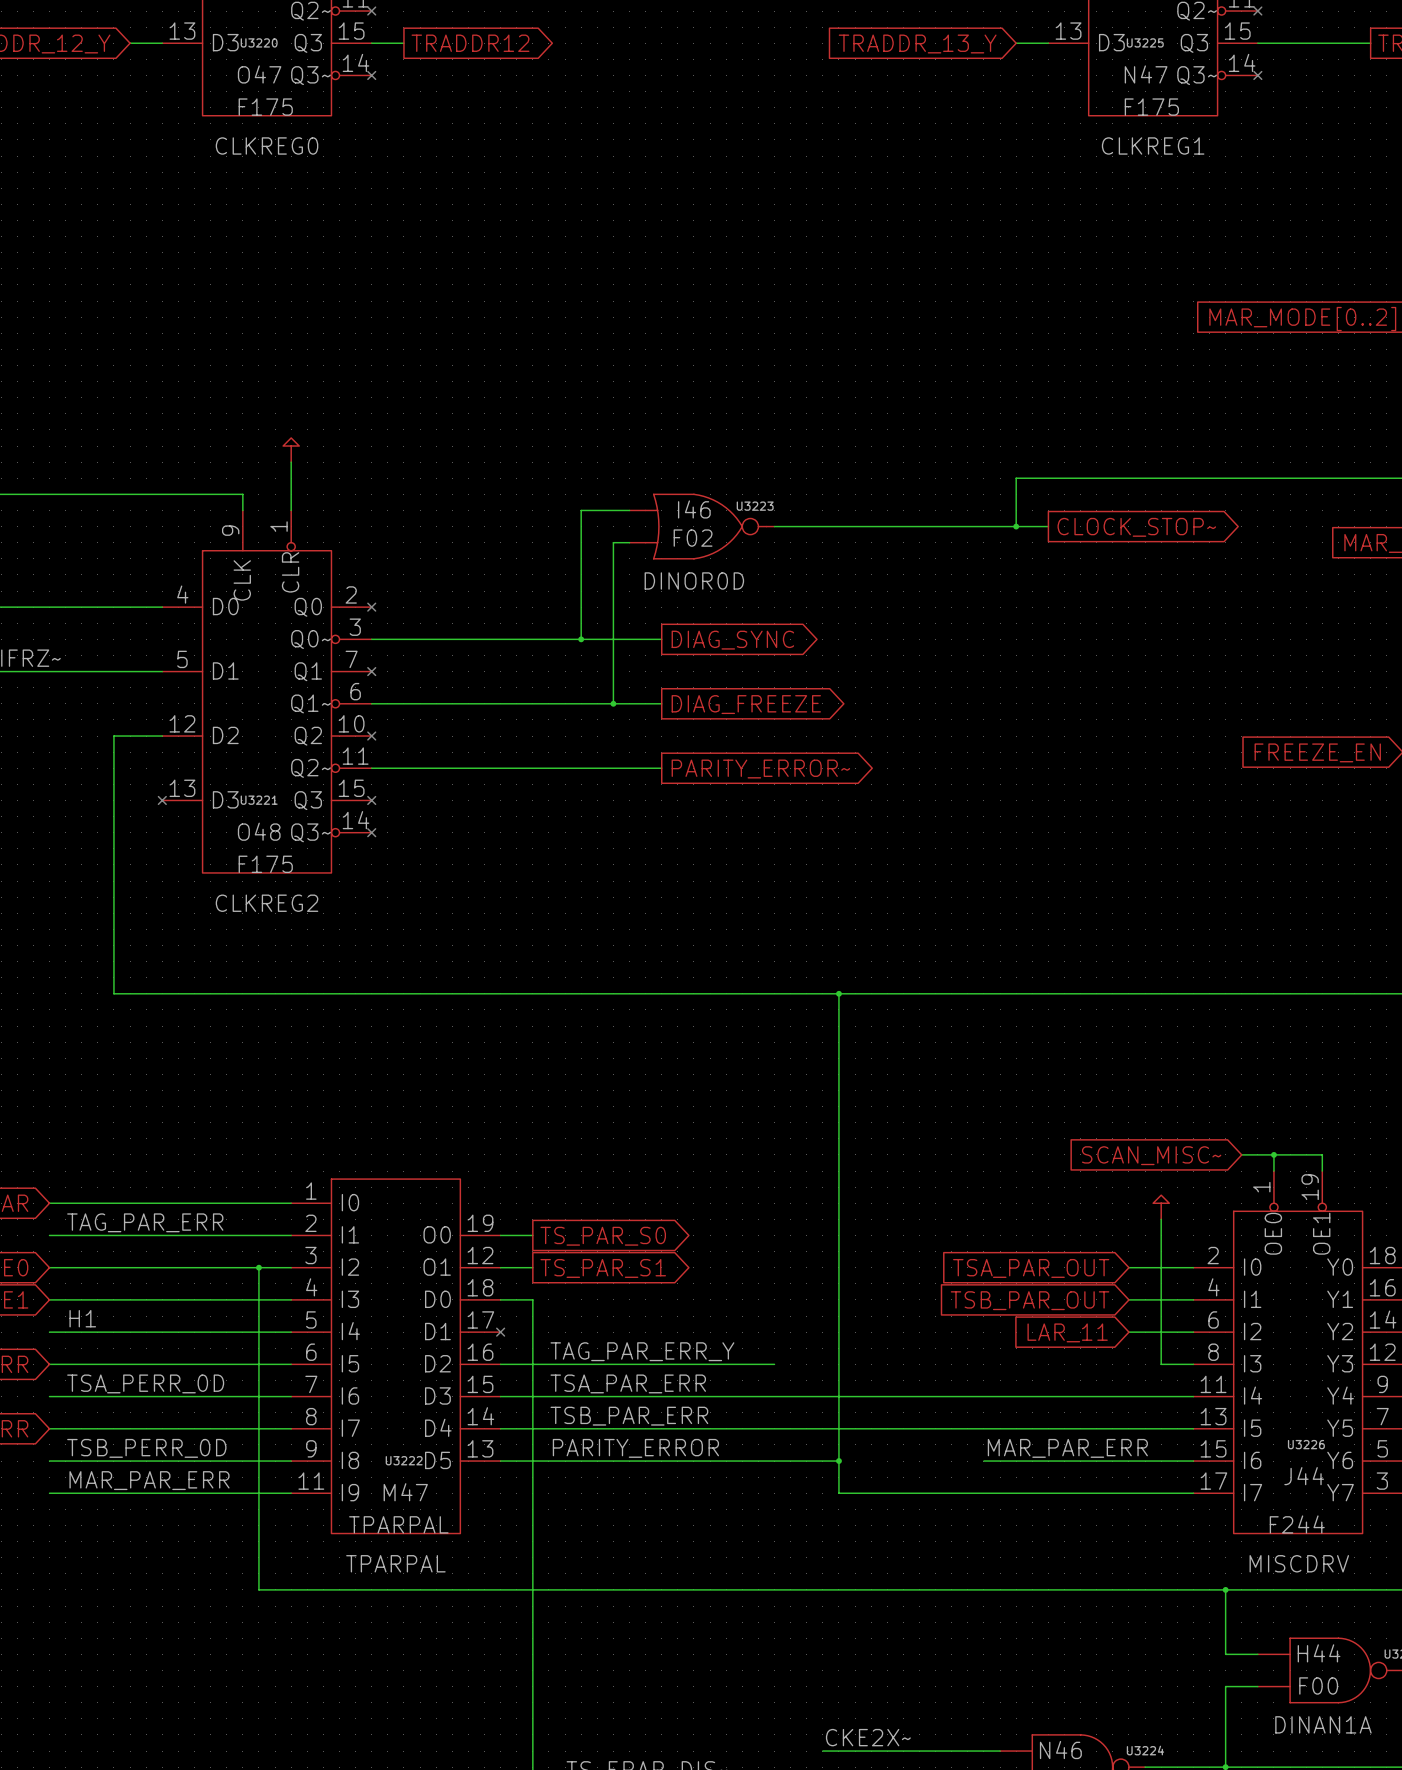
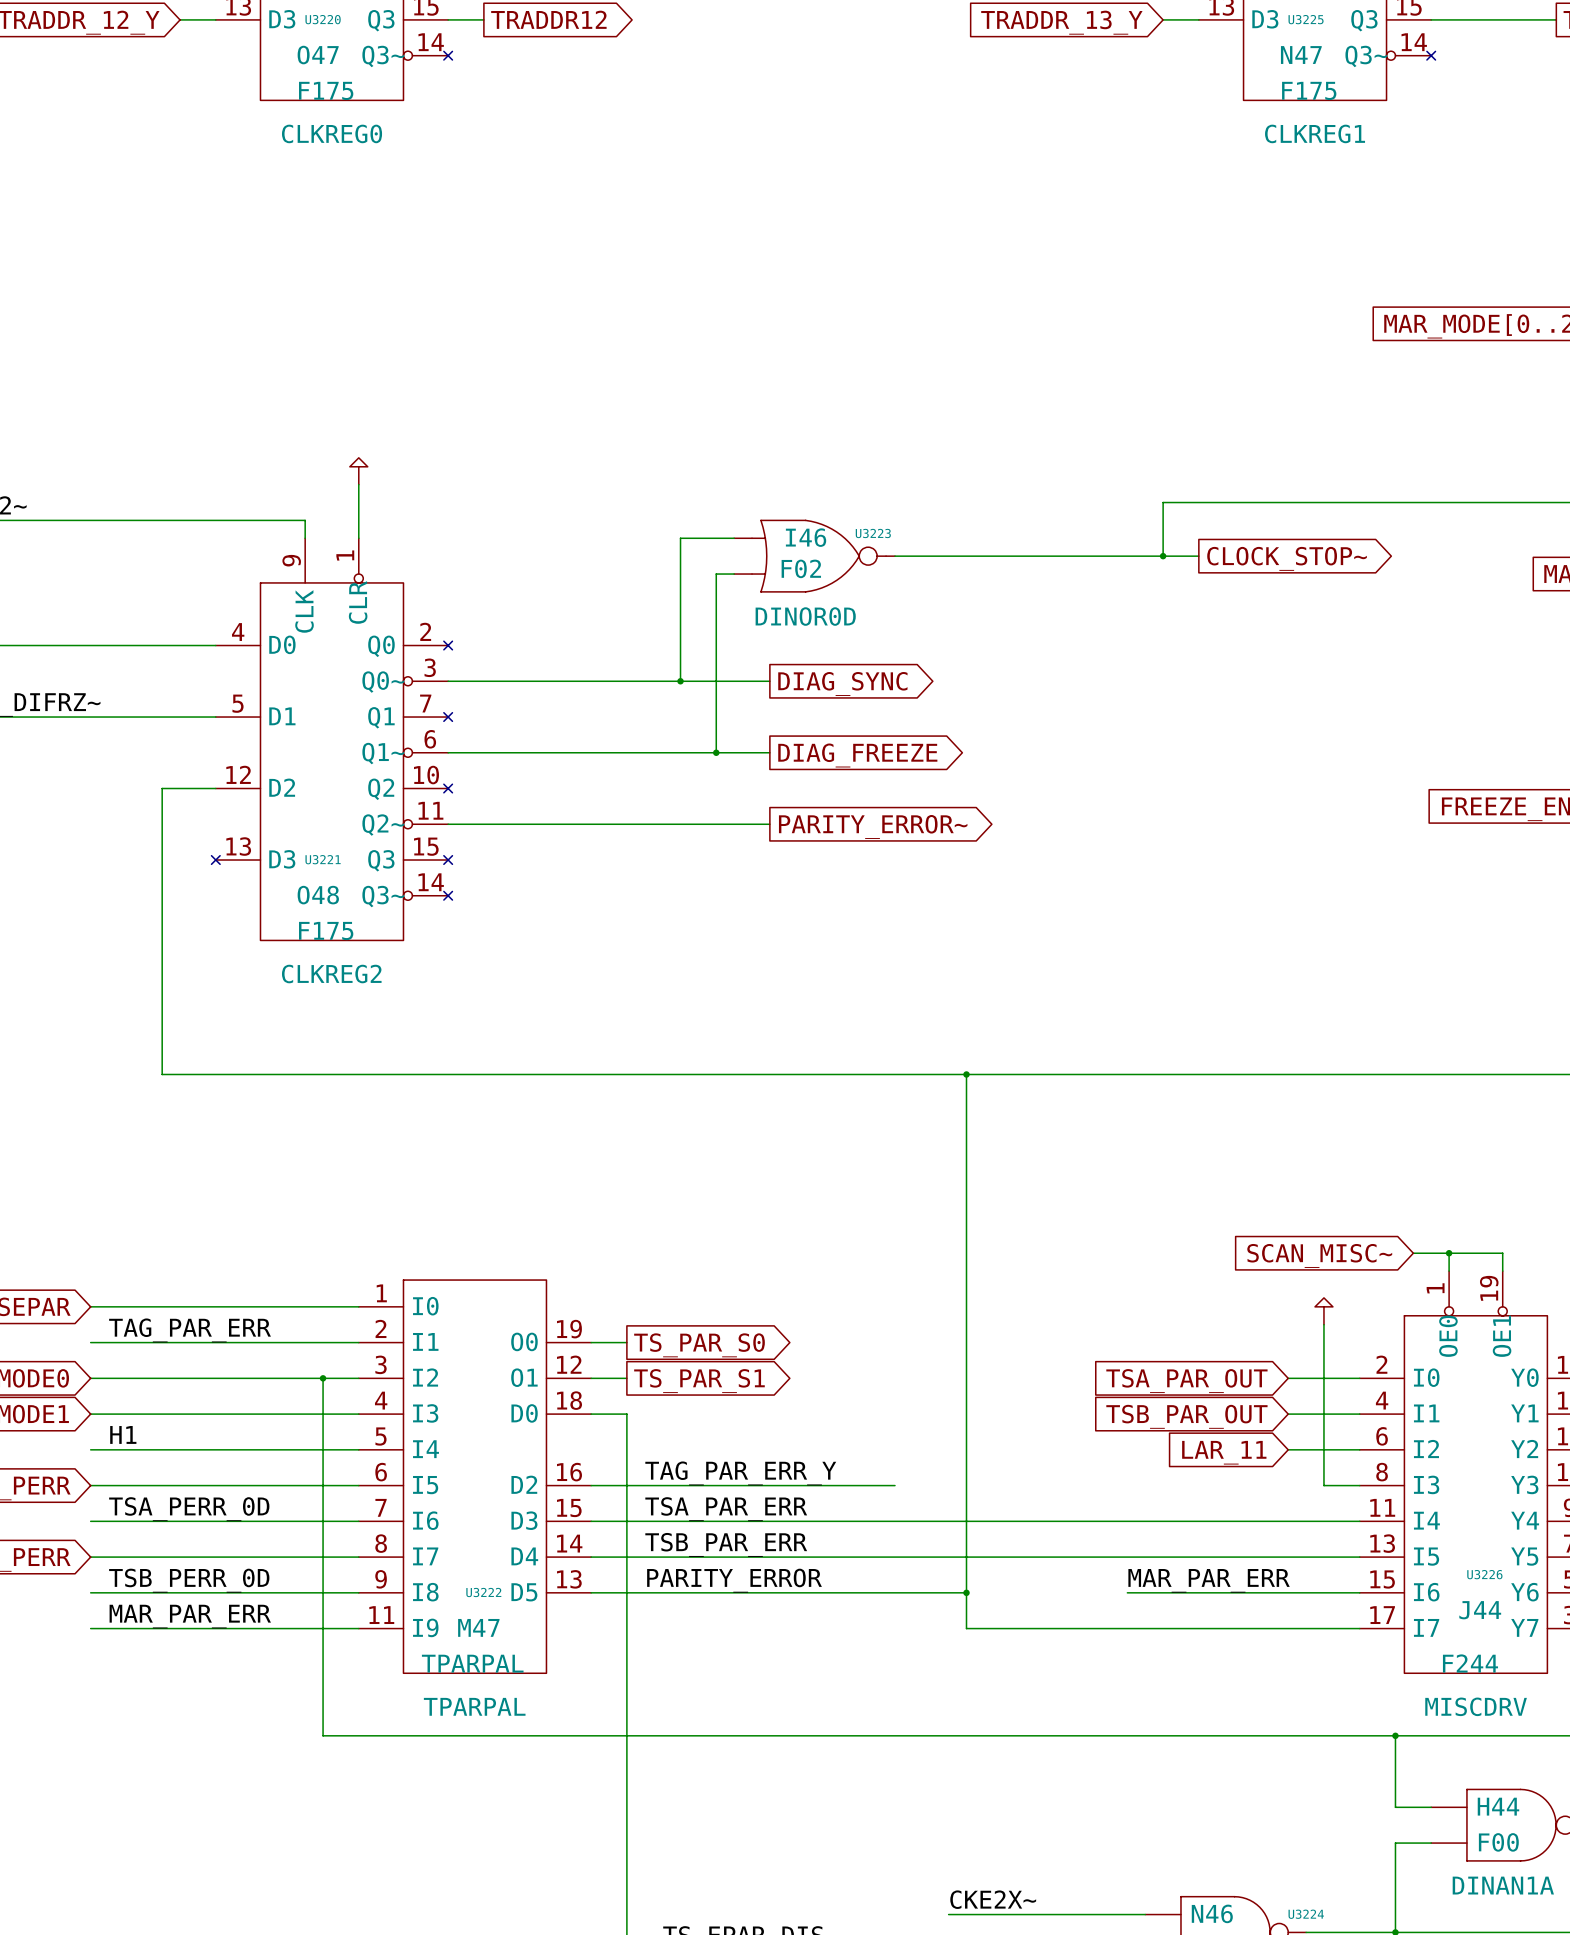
U3222 symbol: [291, 1179, 501, 1534] -> [358, 1280, 592, 1674]
no-connect mark: (500, 1332) -> none

